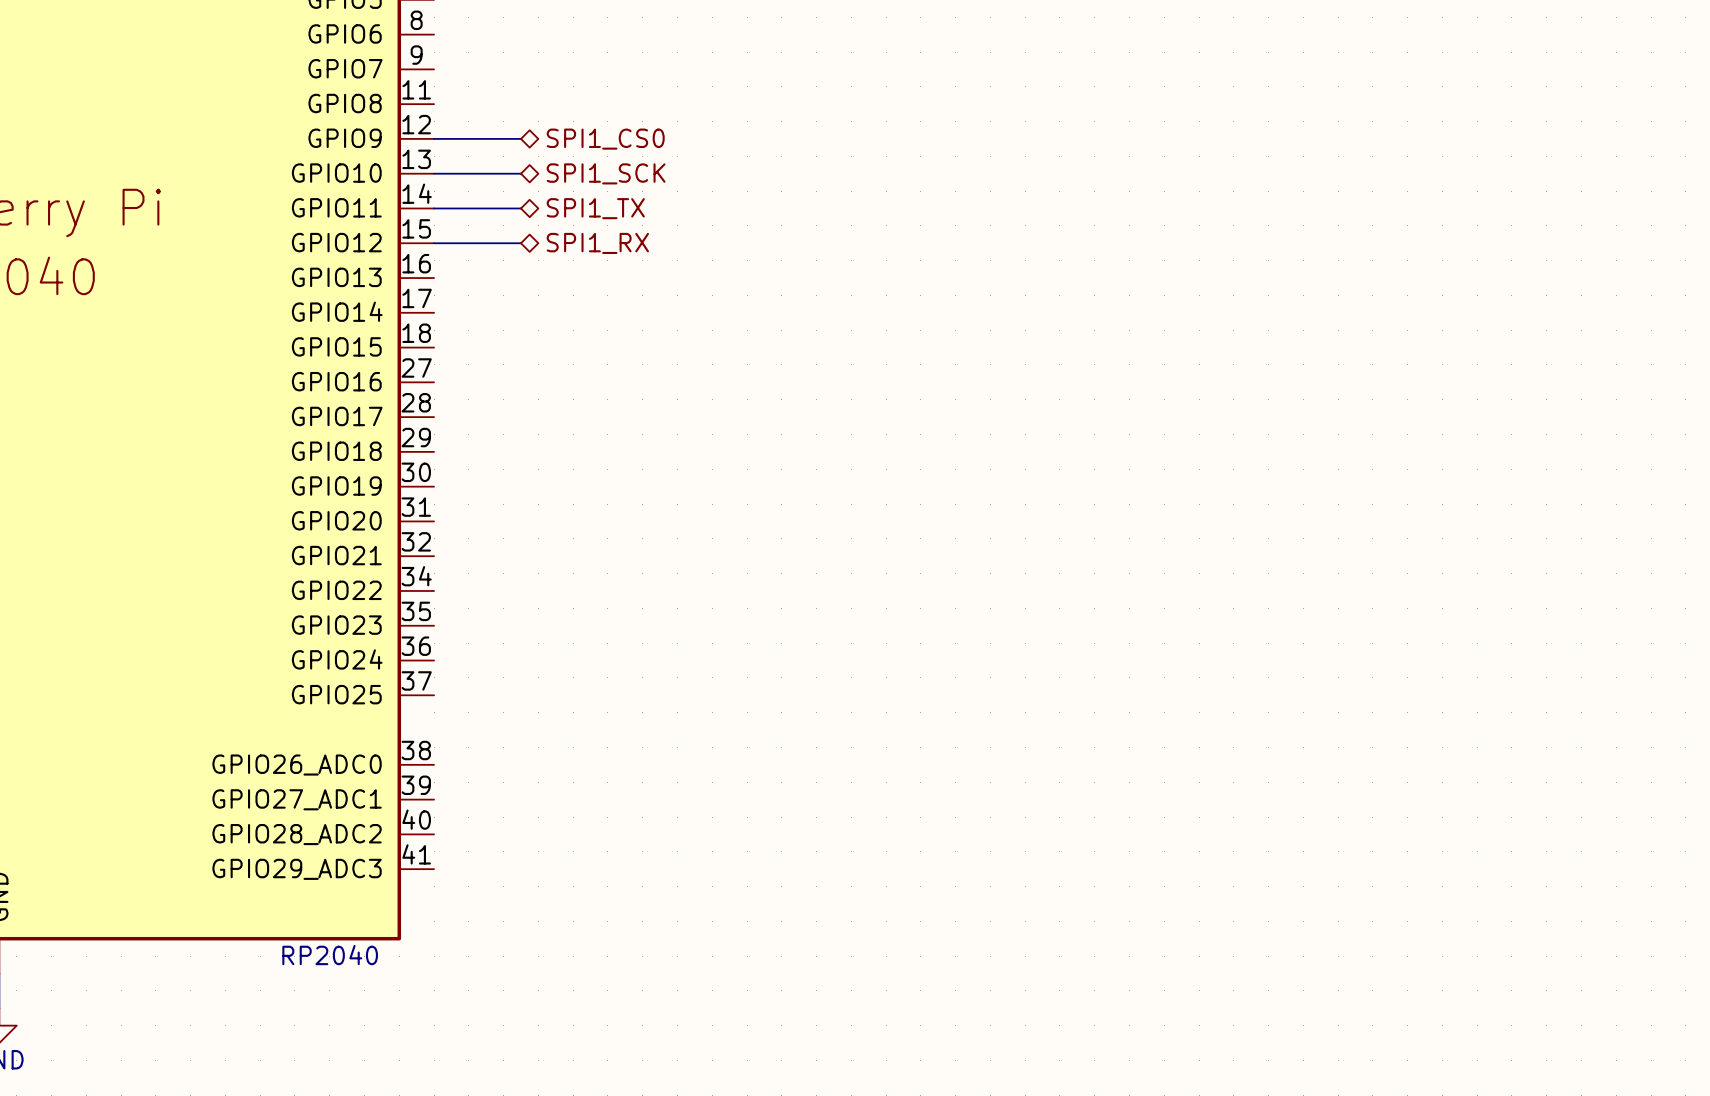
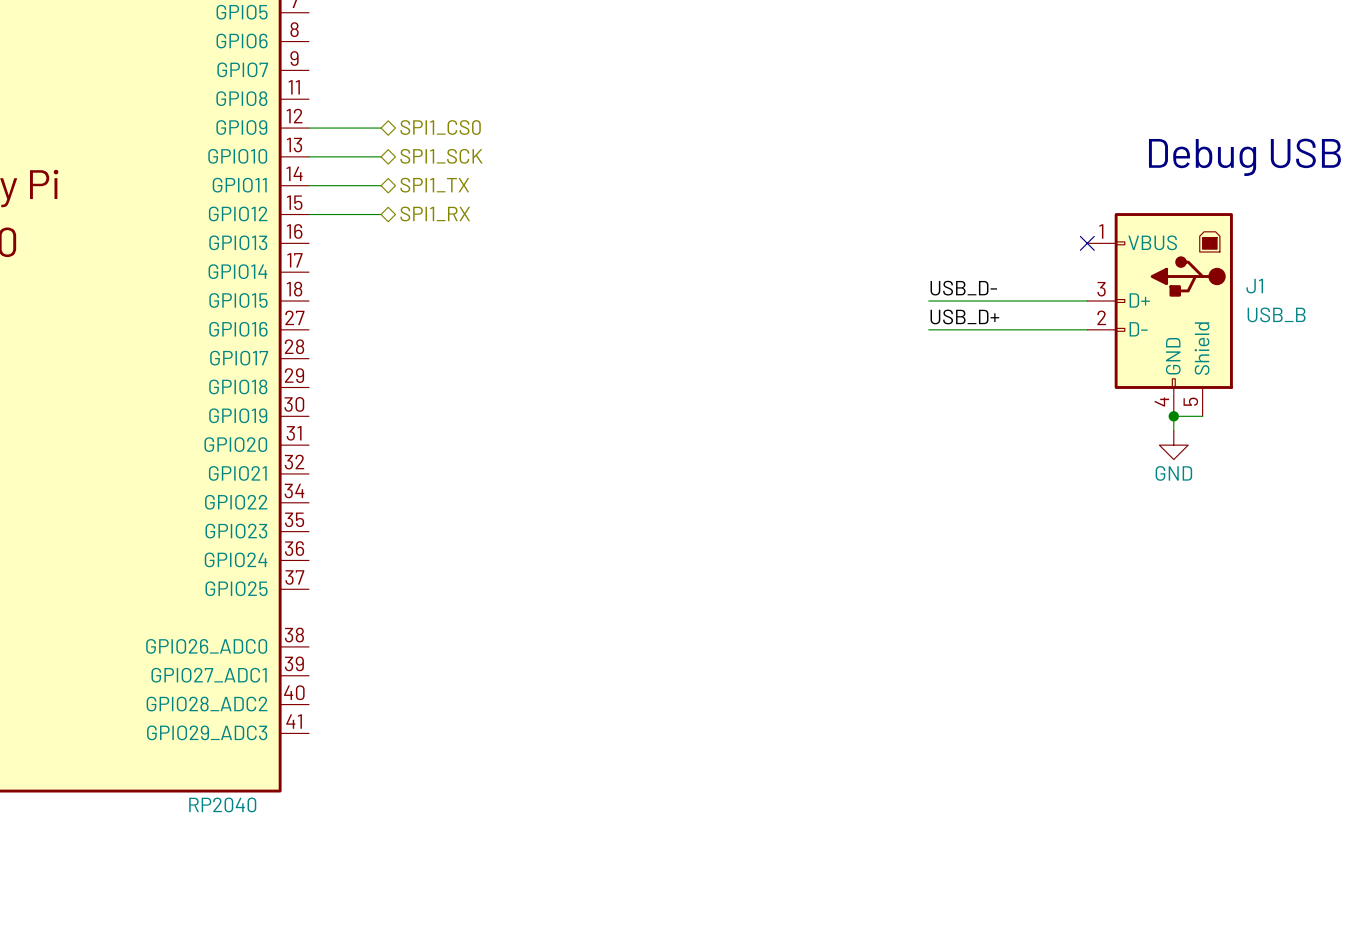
text: none -> Debug USB (1244, 157)
no-connect mark: none -> (1087, 243)
label: none -> USB_D- (963, 288)
wire: none -> (928, 301) (1087, 301)
J1: none -> USB_B (1160, 314)
label: none -> USB_D+ (964, 316)
wire: none -> (928, 329) (1087, 329)
junction: none -> (1173, 416)
wire: none -> (1202, 416) (1173, 416) (1173, 430)
power symbol: none -> GND (1173, 445)

